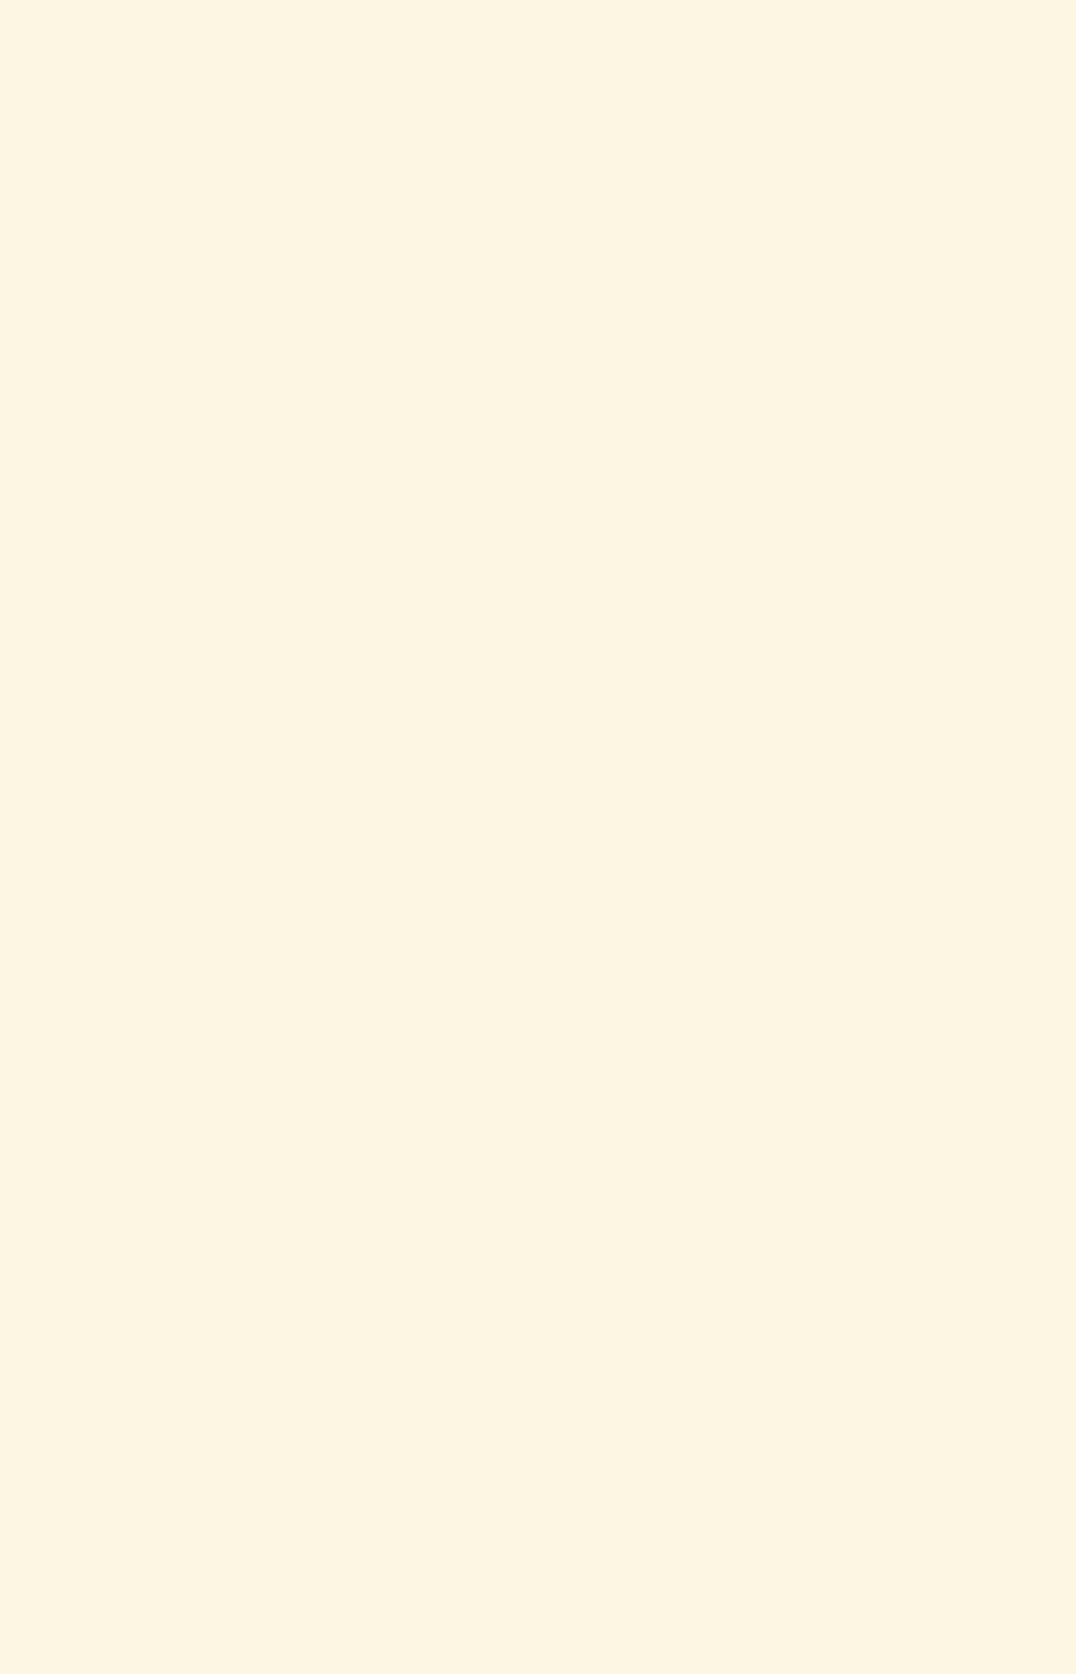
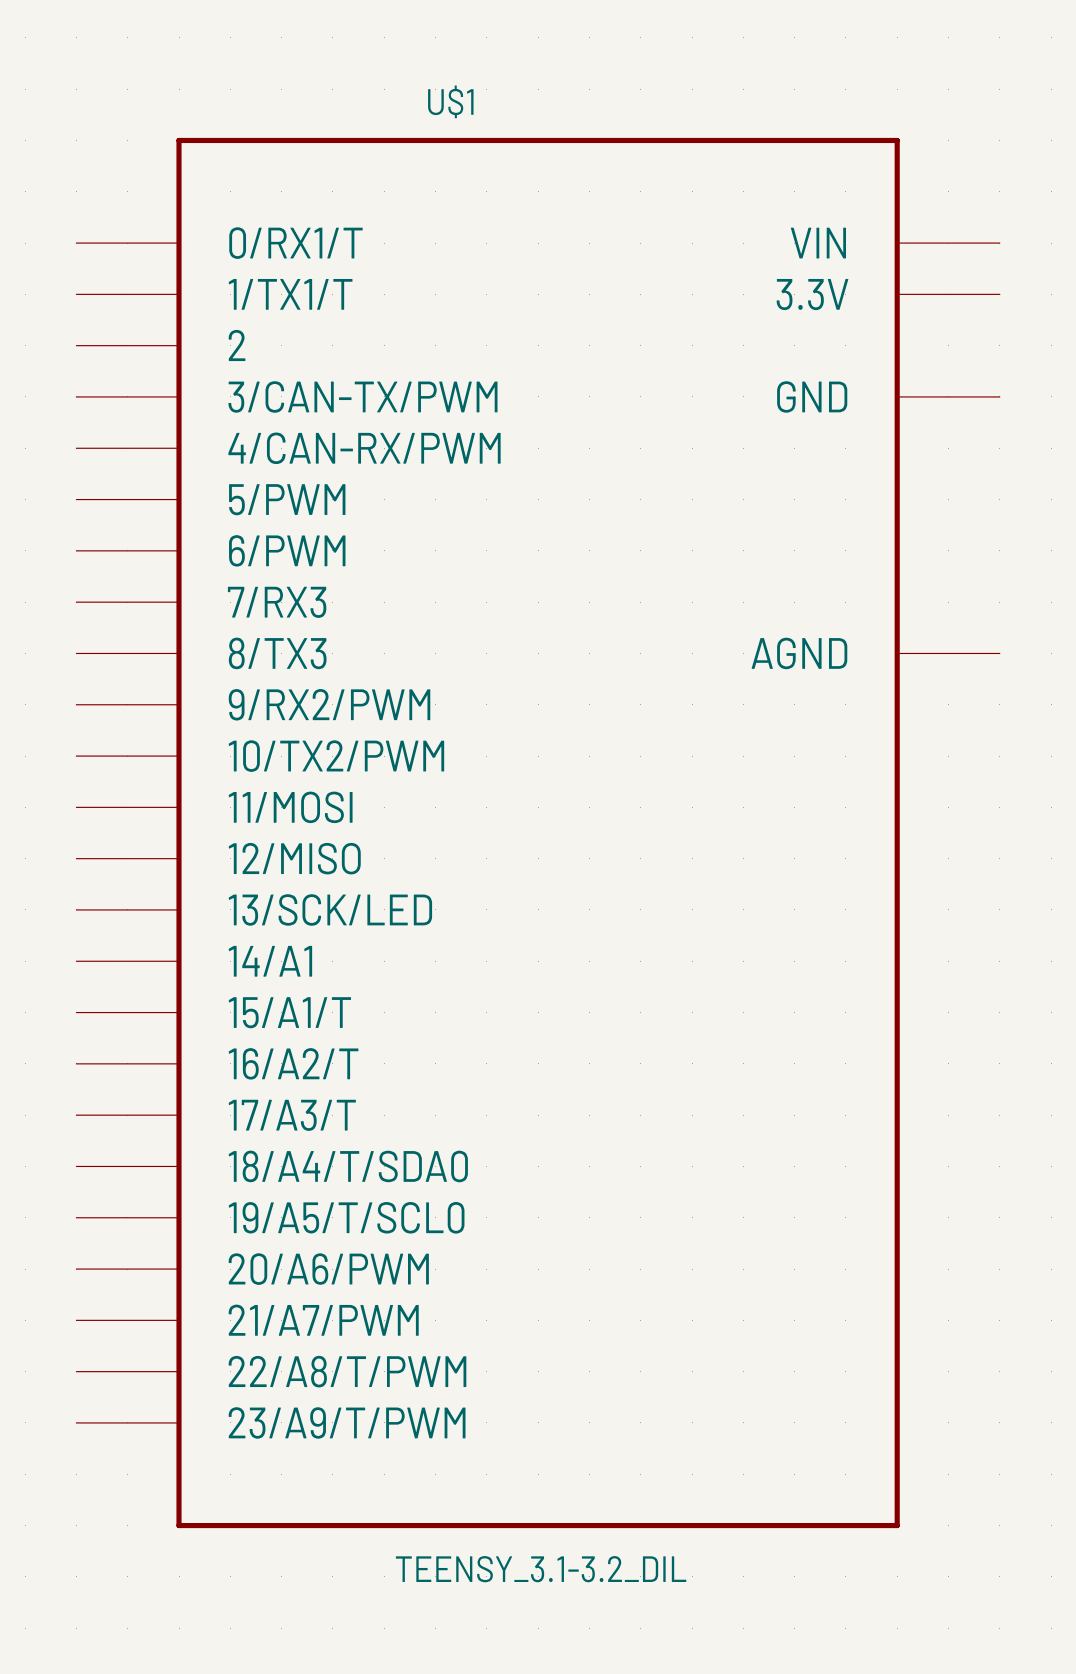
U$1: none -> TEENSY_3.1-3.2_DIL (538, 833)

